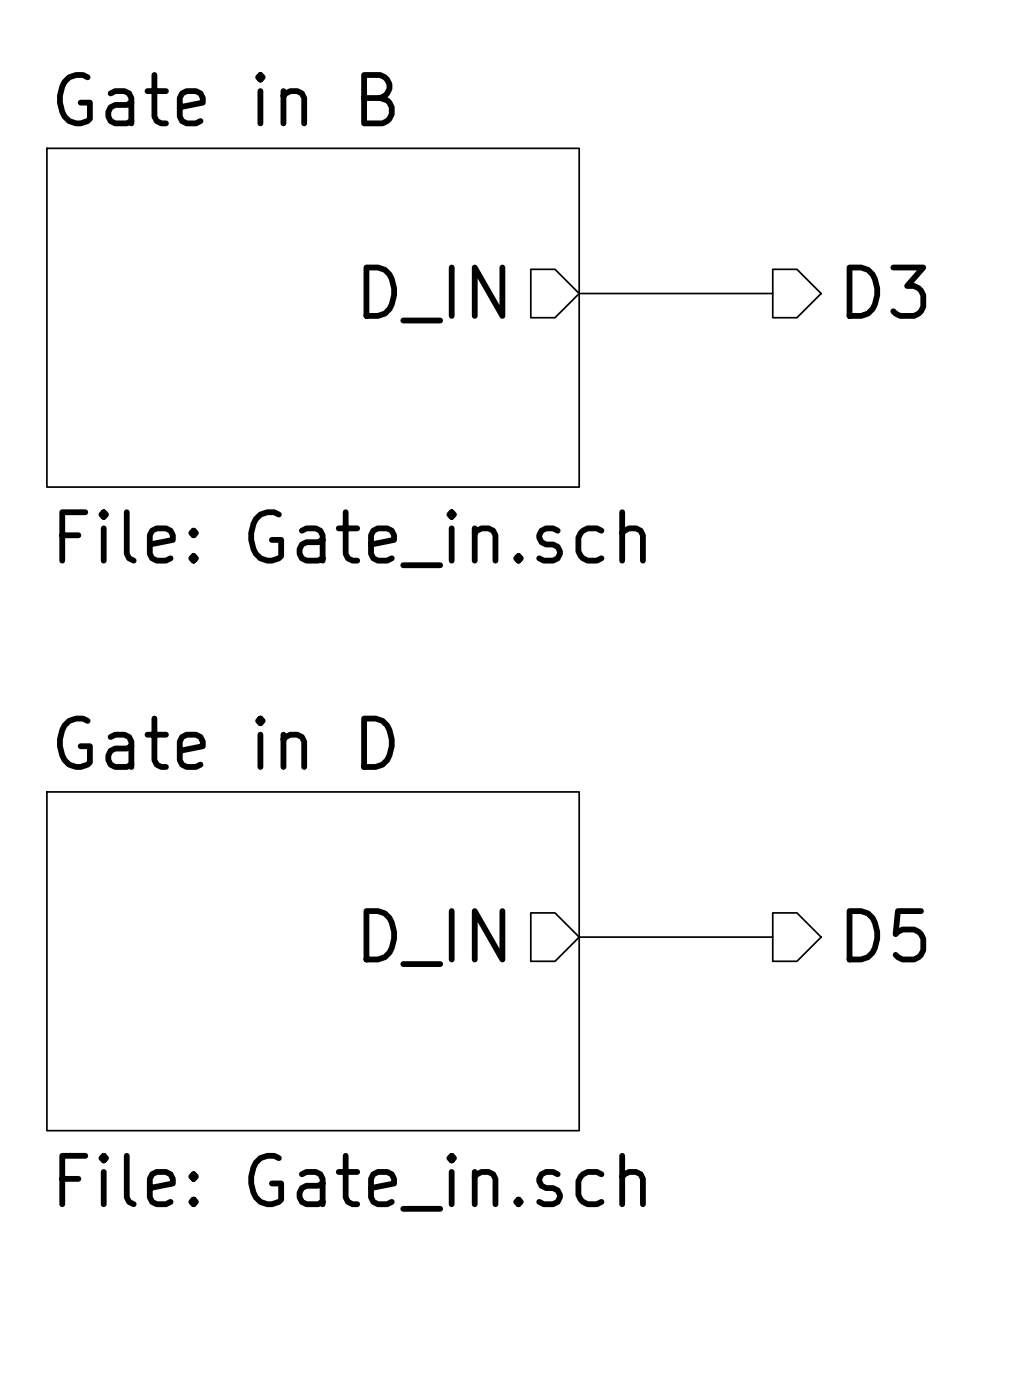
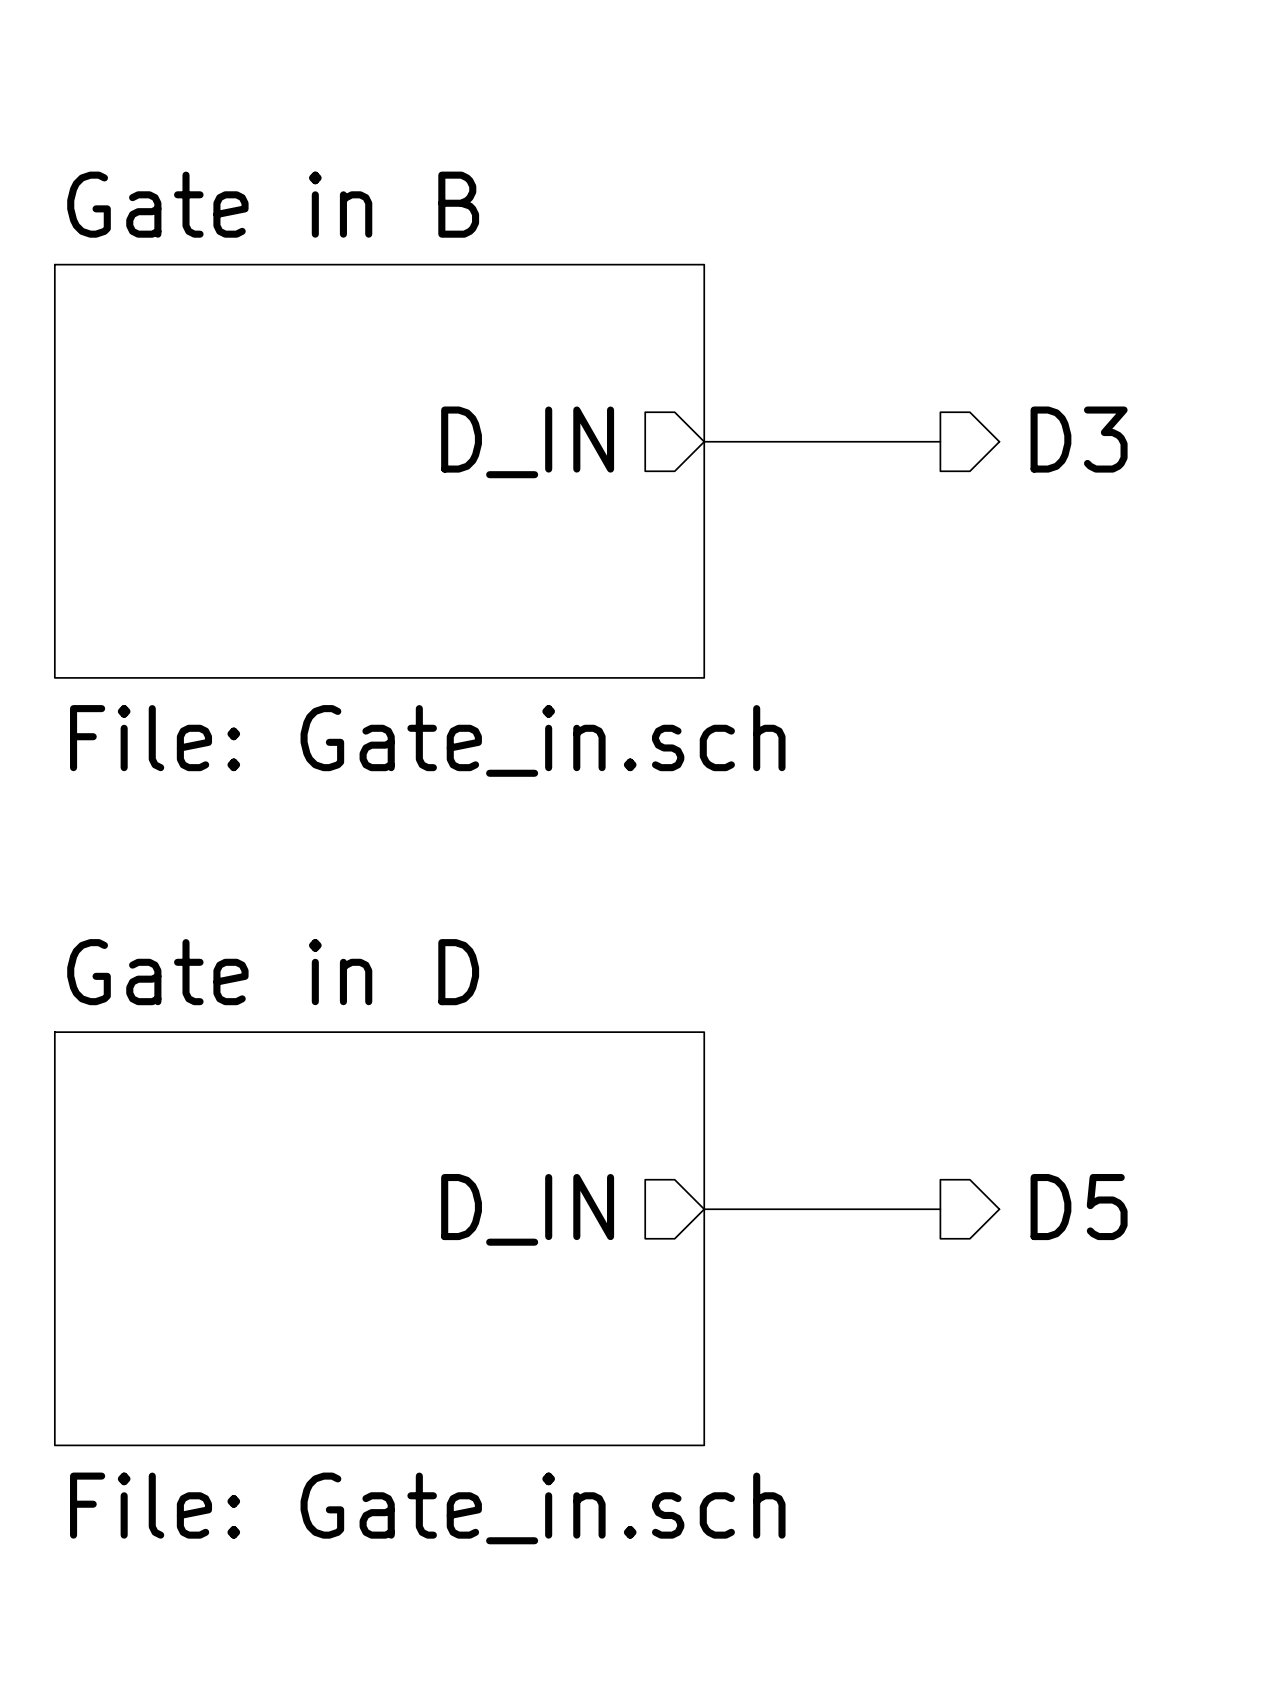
hierarchical label position: D5 (886, 935) -> D5 (1079, 1207)
sheet pin position: D_IN (434, 937) -> D_IN (527, 1209)
wire: (579, 937) (772, 937) -> (704, 1209) (940, 1209)
sheet Gate in D position: (313, 961) -> (379, 1238)

